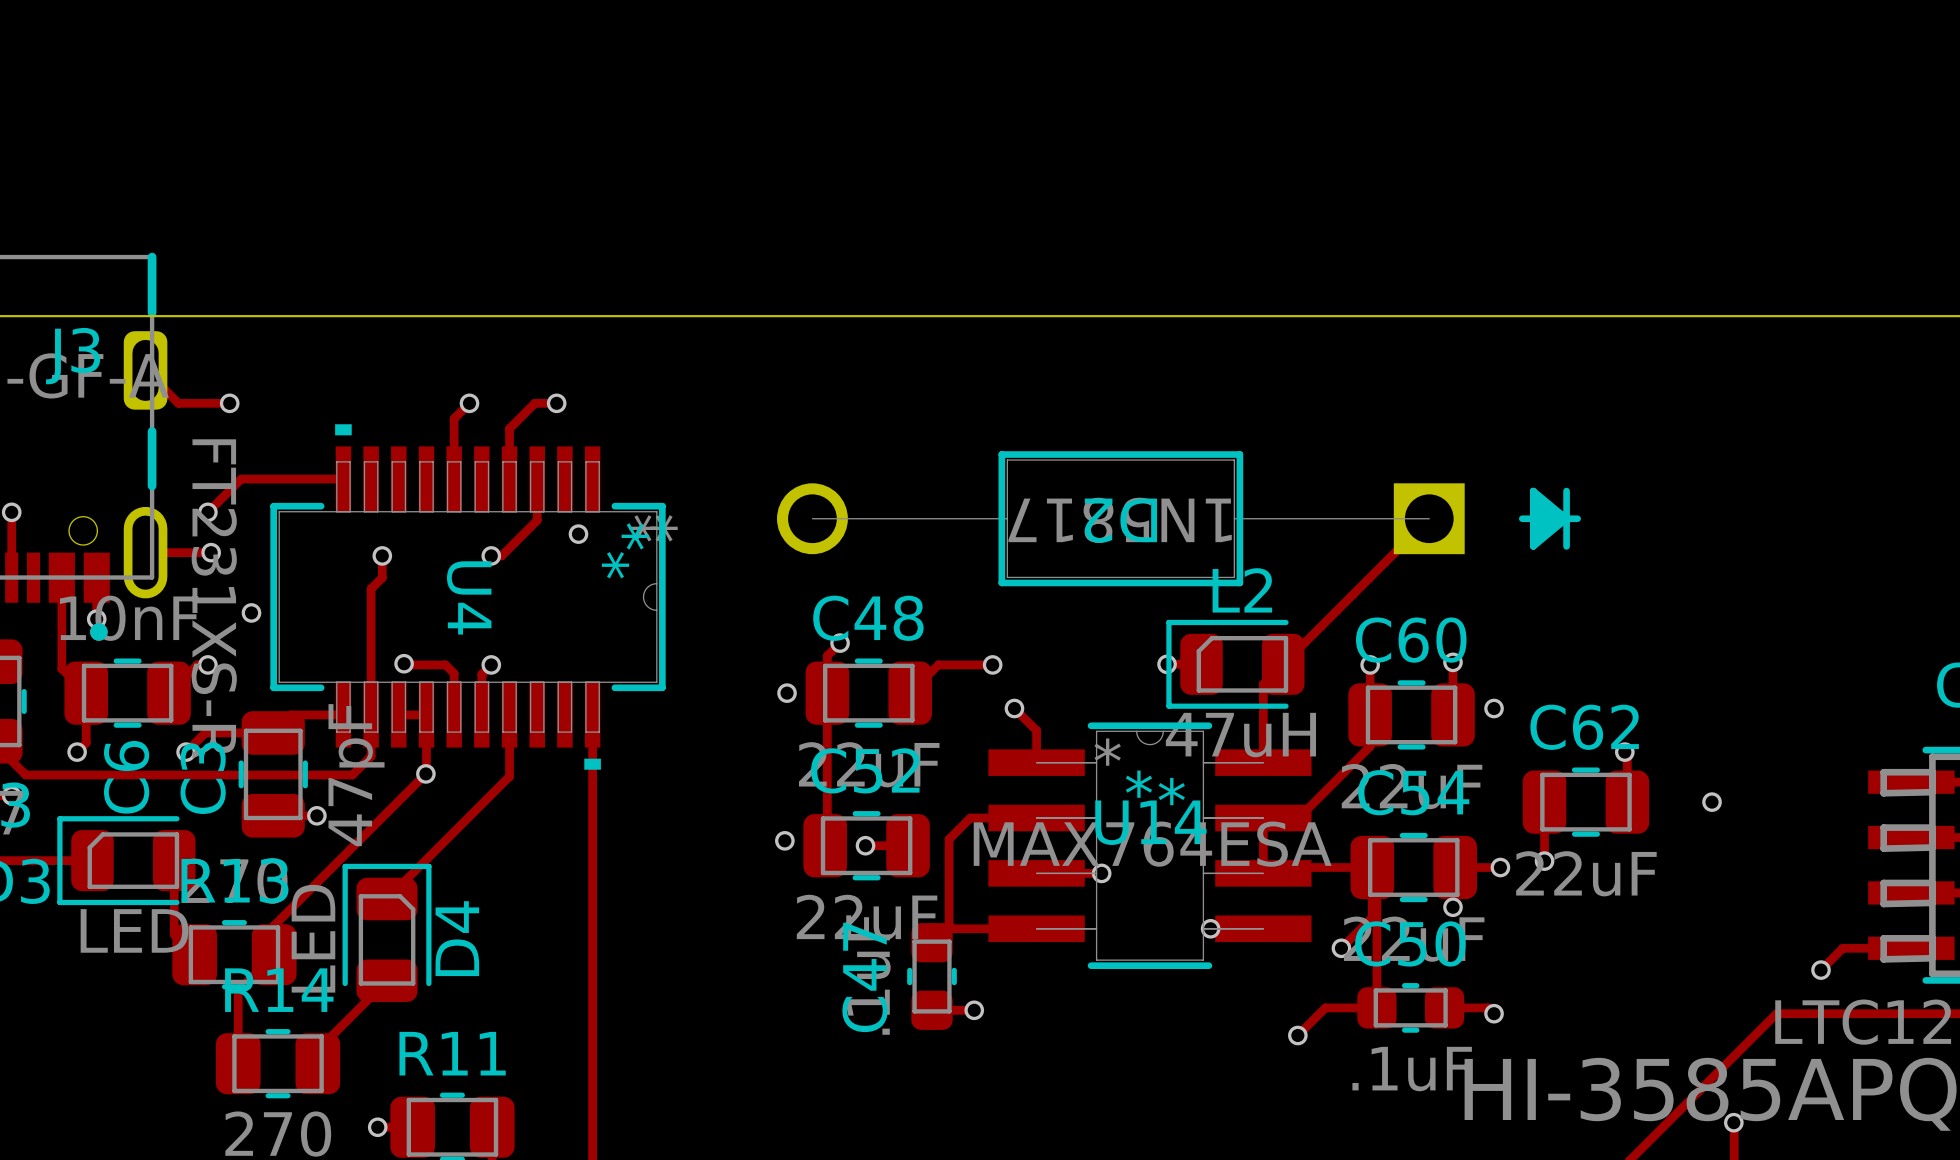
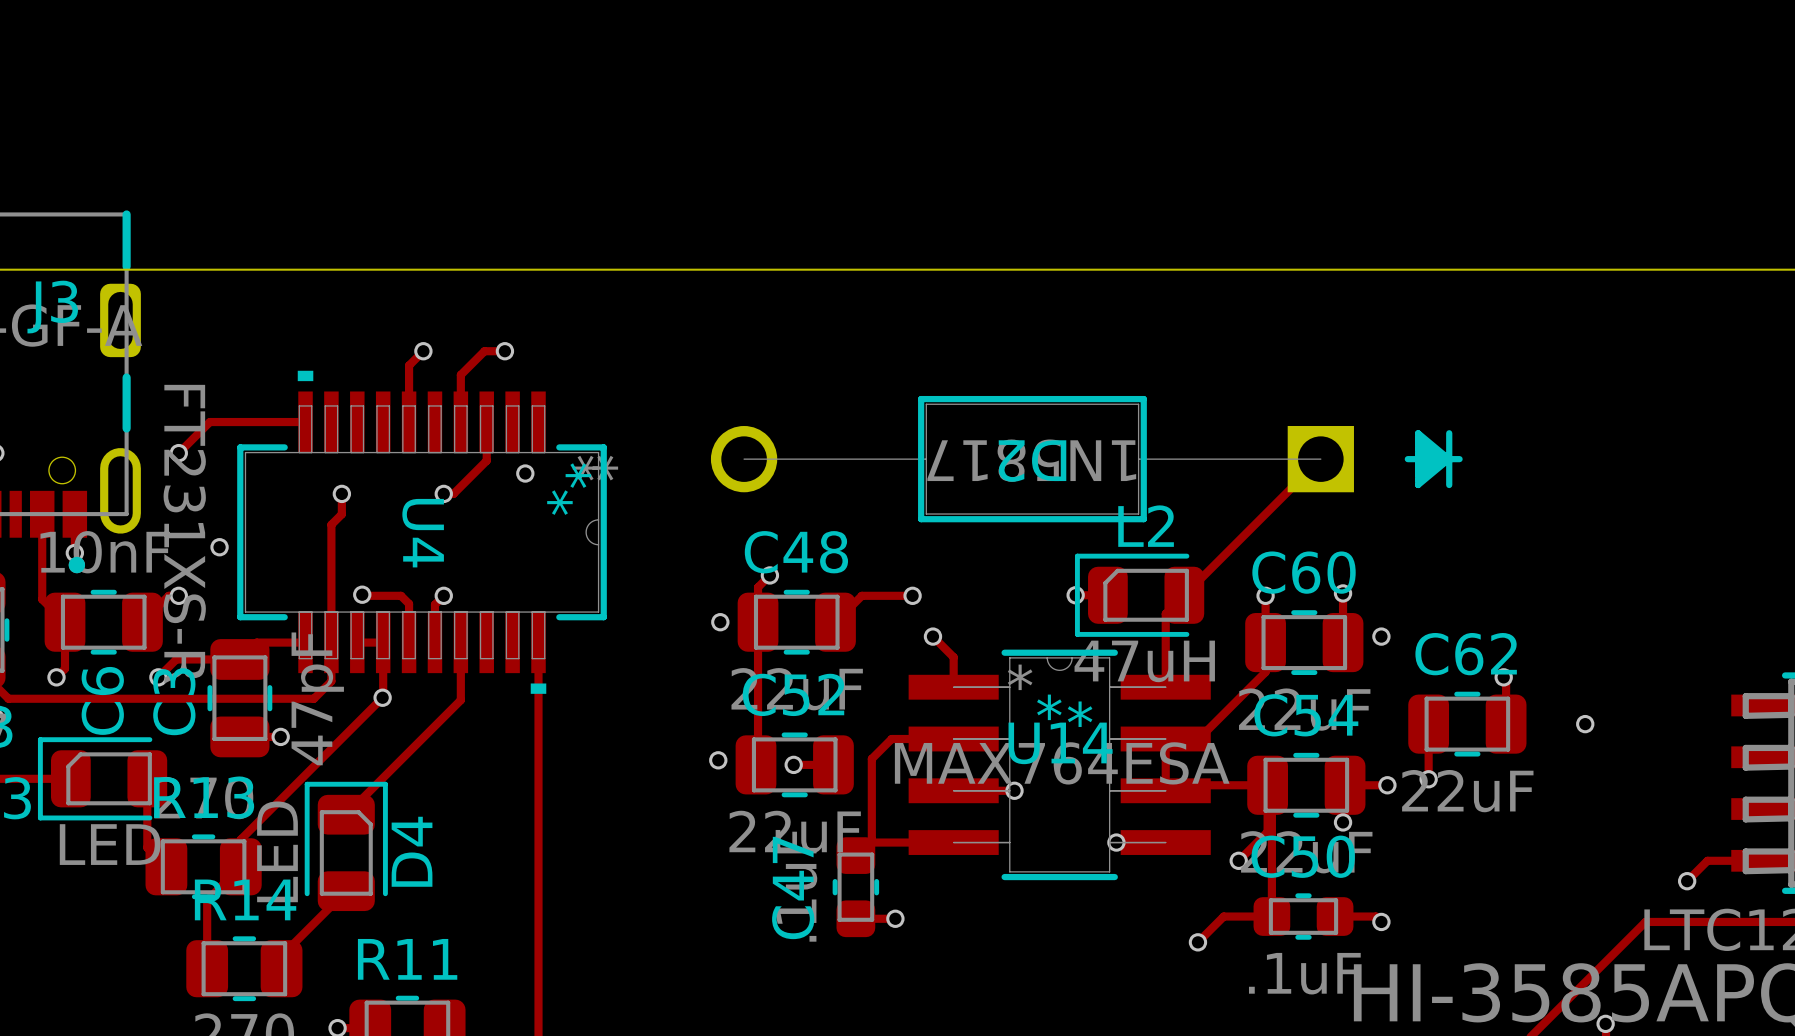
track: (145, 370) (178, 403) (229, 403) -> none
via: (229, 403) -> none
track: (145, 552) (211, 552) -> none
via: (211, 552) -> none

